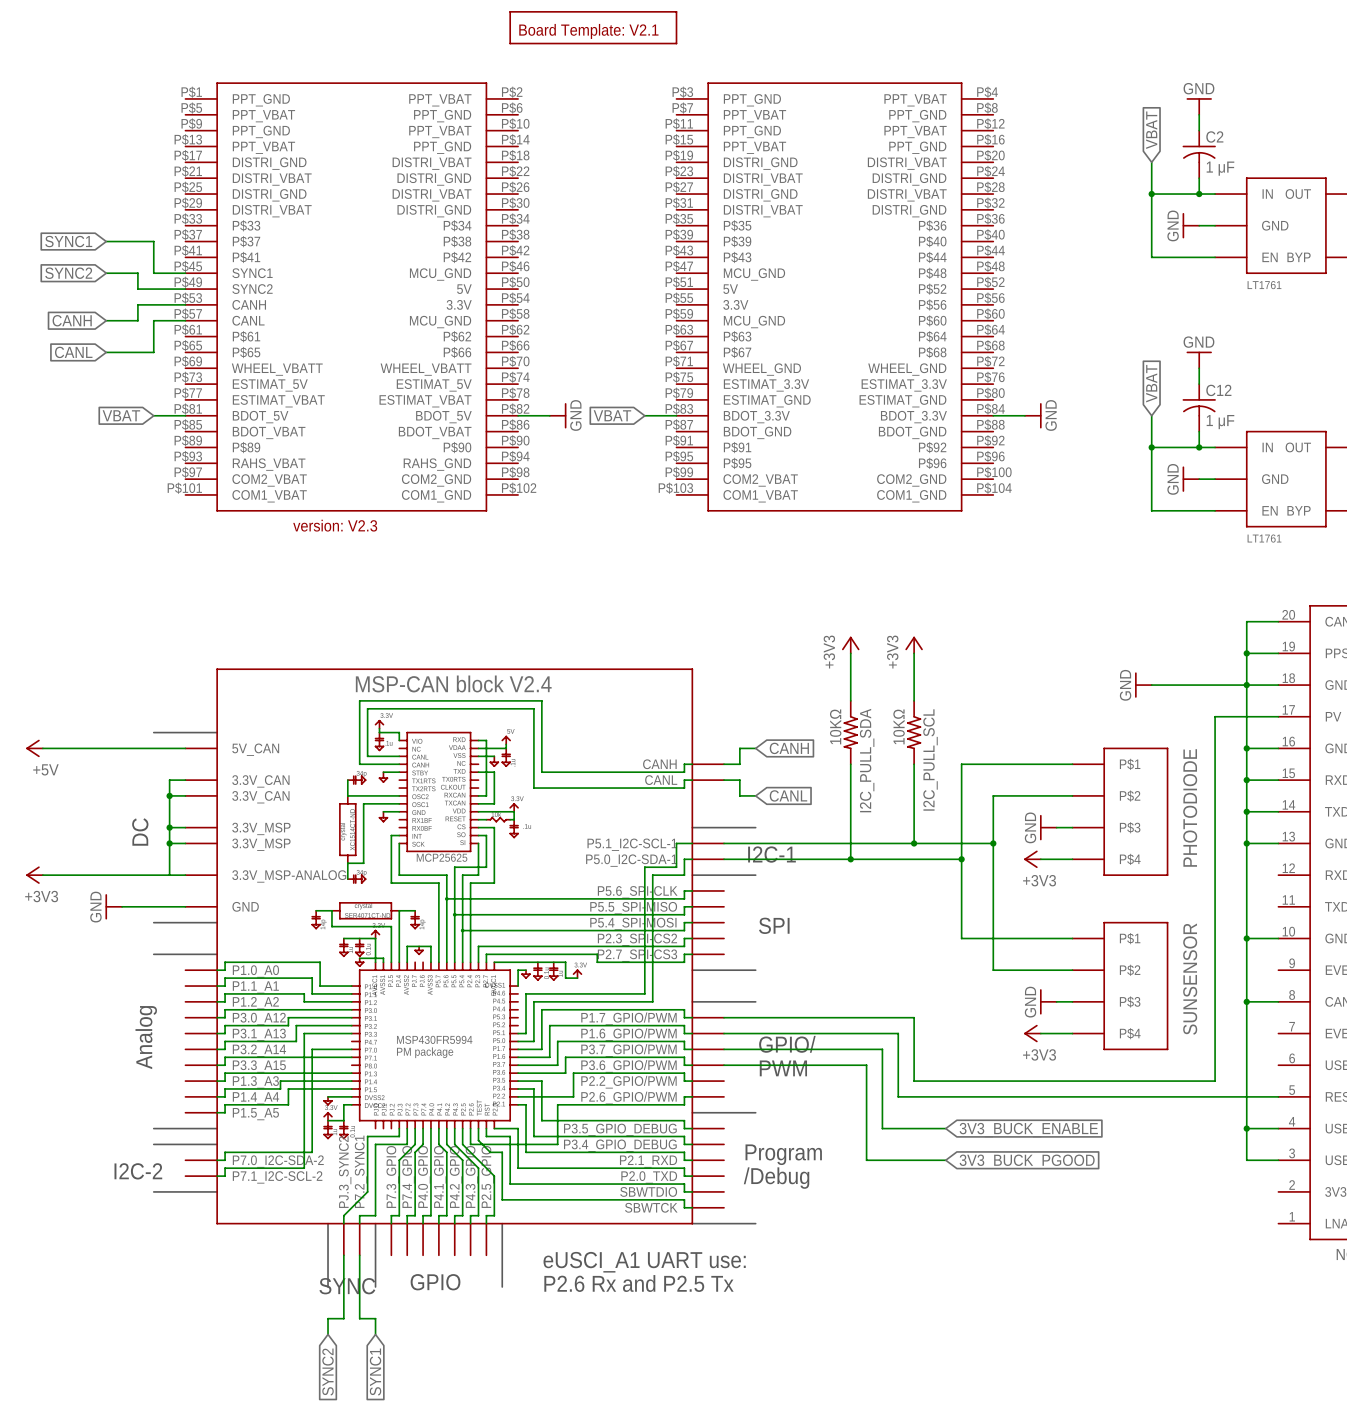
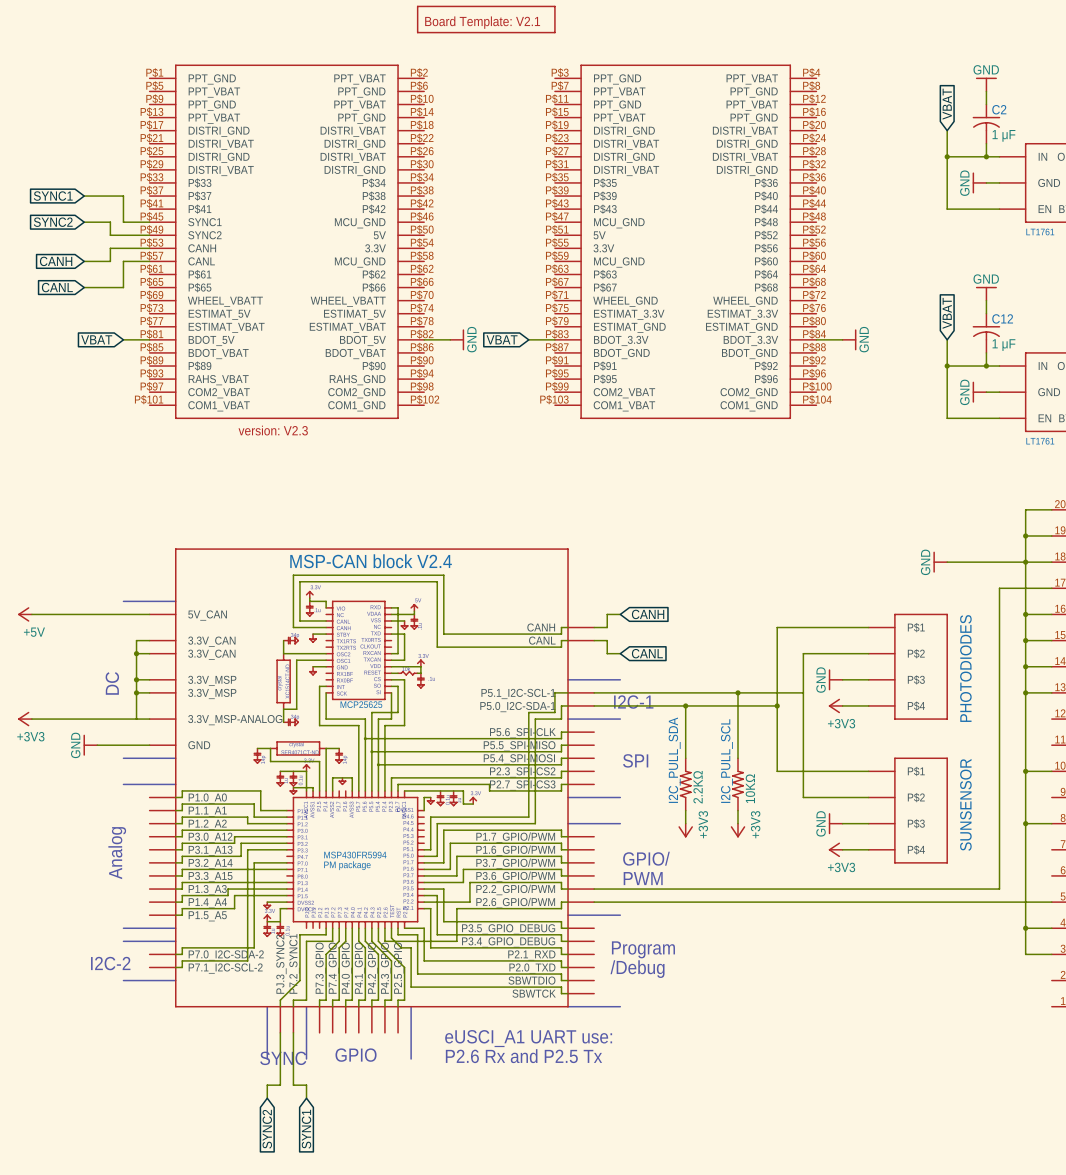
power symbol: +3V3 (850, 645) -> none
power symbol: +3V3 (914, 645) -> none
wire: (850, 653) (850, 700) -> none
wire: (914, 653) (914, 700) -> none
I2C_PULL_SDA value: 10KΩ (835, 726) -> 2.2KΩ (698, 787)
I2C_PULL_SDA rotation: 0° (850, 732) -> 180° (685, 784)
I2C_PULL_SDA position: (850, 732) -> (685, 784)
I2C_PULL_SCL rotation: 0° (914, 732) -> 180° (738, 784)
I2C_PULL_SCL position: (914, 732) -> (738, 784)
wire: (850, 764) (850, 859) -> none
wire: (914, 764) (914, 843) -> (738, 692) (738, 758)
wire: (961, 764) (961, 938) -> (790, 627) (777, 627) (777, 771) (790, 771)
wire: (993, 795) (993, 970) -> (816, 653) (803, 653) (803, 797) (816, 797)
PHOTODIODES: none -> (908, 666)
PHOTODIODE: (1120, 811) -> none
power symbol position: GND (1048, 827) -> GND (835, 679)
junction position: (914, 843) -> (738, 692)
wire: (977, 843) (993, 843) -> none
junction: (993, 843) -> none
wire: none -> (685, 705) (685, 758)
junction position: (850, 859) -> (685, 705)
wire: (945, 859) (961, 859) -> none
junction position: (961, 859) -> (777, 705)
power symbol position: +3V3 (1032, 859) -> +3V3 (835, 705)
wire: none -> (685, 810) (685, 823)
wire: none -> (738, 810) (738, 823)
SUNSENSOR position: (1120, 986) -> (908, 810)
power symbol position: GND (1048, 1001) -> GND (835, 823)
power symbol: none -> +3V3 (685, 830)
power symbol: none -> +3V3 (738, 830)
wire: (724, 1017) (914, 1017) (914, 1081) -> (594, 889) (751, 889)
wire: (724, 1033) (898, 1033) (898, 1096) -> (594, 902) (738, 902)
power symbol position: +3V3 (1032, 1033) -> +3V3 (835, 849)
wire: (724, 1049) (882, 1049) (882, 1128) (945, 1128) -> none
wire: (724, 1065) (866, 1065) (866, 1160) (945, 1160) -> none
global label: 3V3_BUCK_ENABLE (1028, 1130) -> none
global label: 3V3_BUCK_PGOOD (1027, 1161) -> none

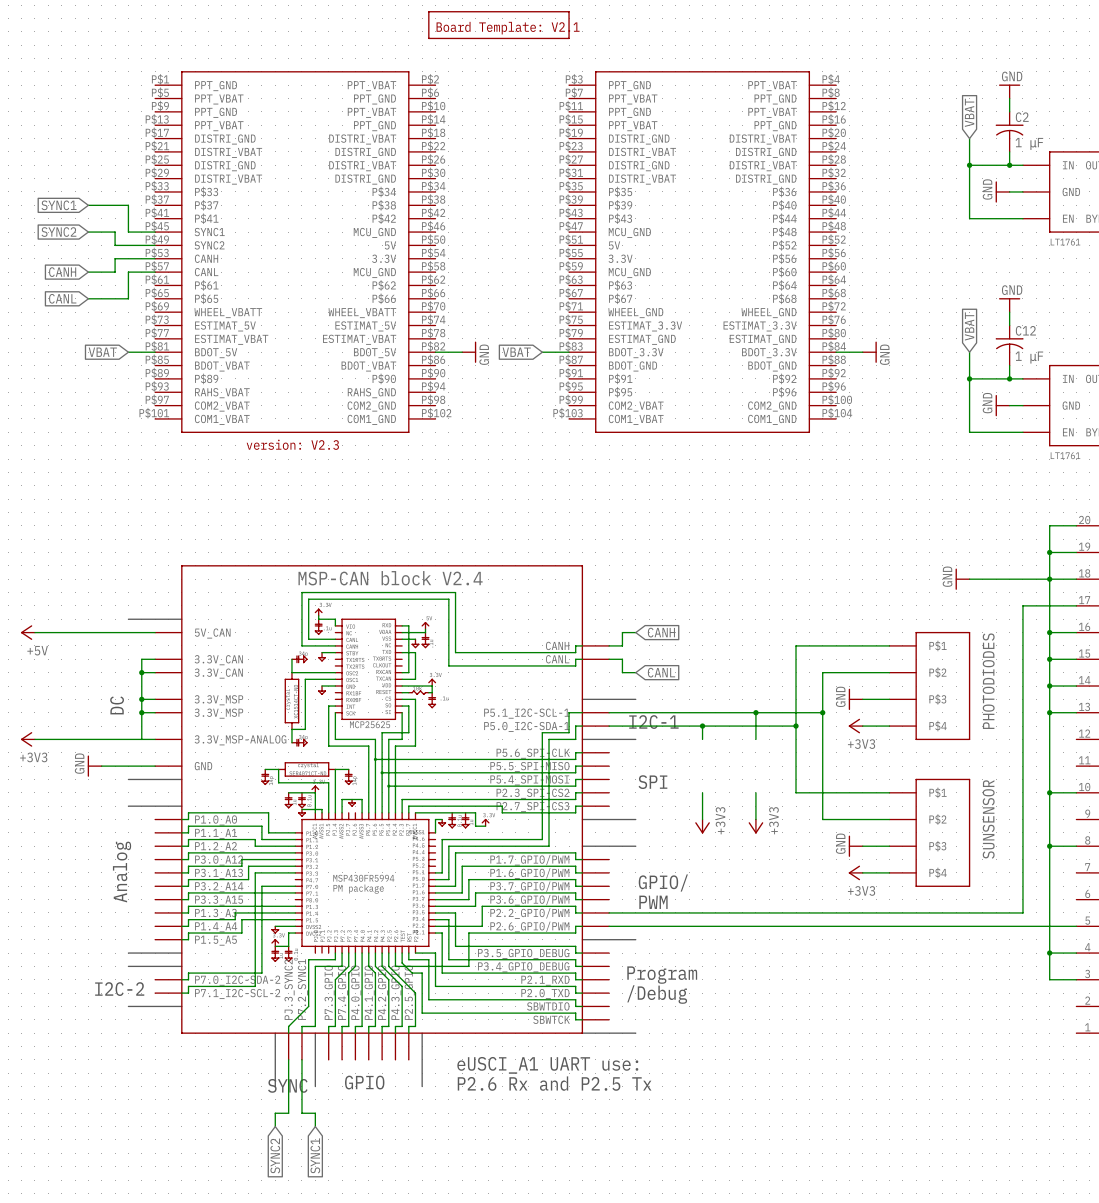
junction: none -> (822, 712)
wire: (685, 719) (685, 758) -> none
wire: (738, 719) (738, 758) -> none
wire: none -> (702, 792) (702, 819)
wire: none -> (755, 792) (755, 819)
I2C_PULL_SDA: 2.2KΩ (685, 784) -> none
I2C_PULL_SCL: 10KΩ (738, 784) -> none
wire: (685, 810) (685, 823) -> none
wire: (738, 810) (738, 823) -> none
power symbol position: +3V3 (685, 830) -> +3V3 (702, 826)
power symbol position: +3V3 (738, 830) -> +3V3 (755, 826)

